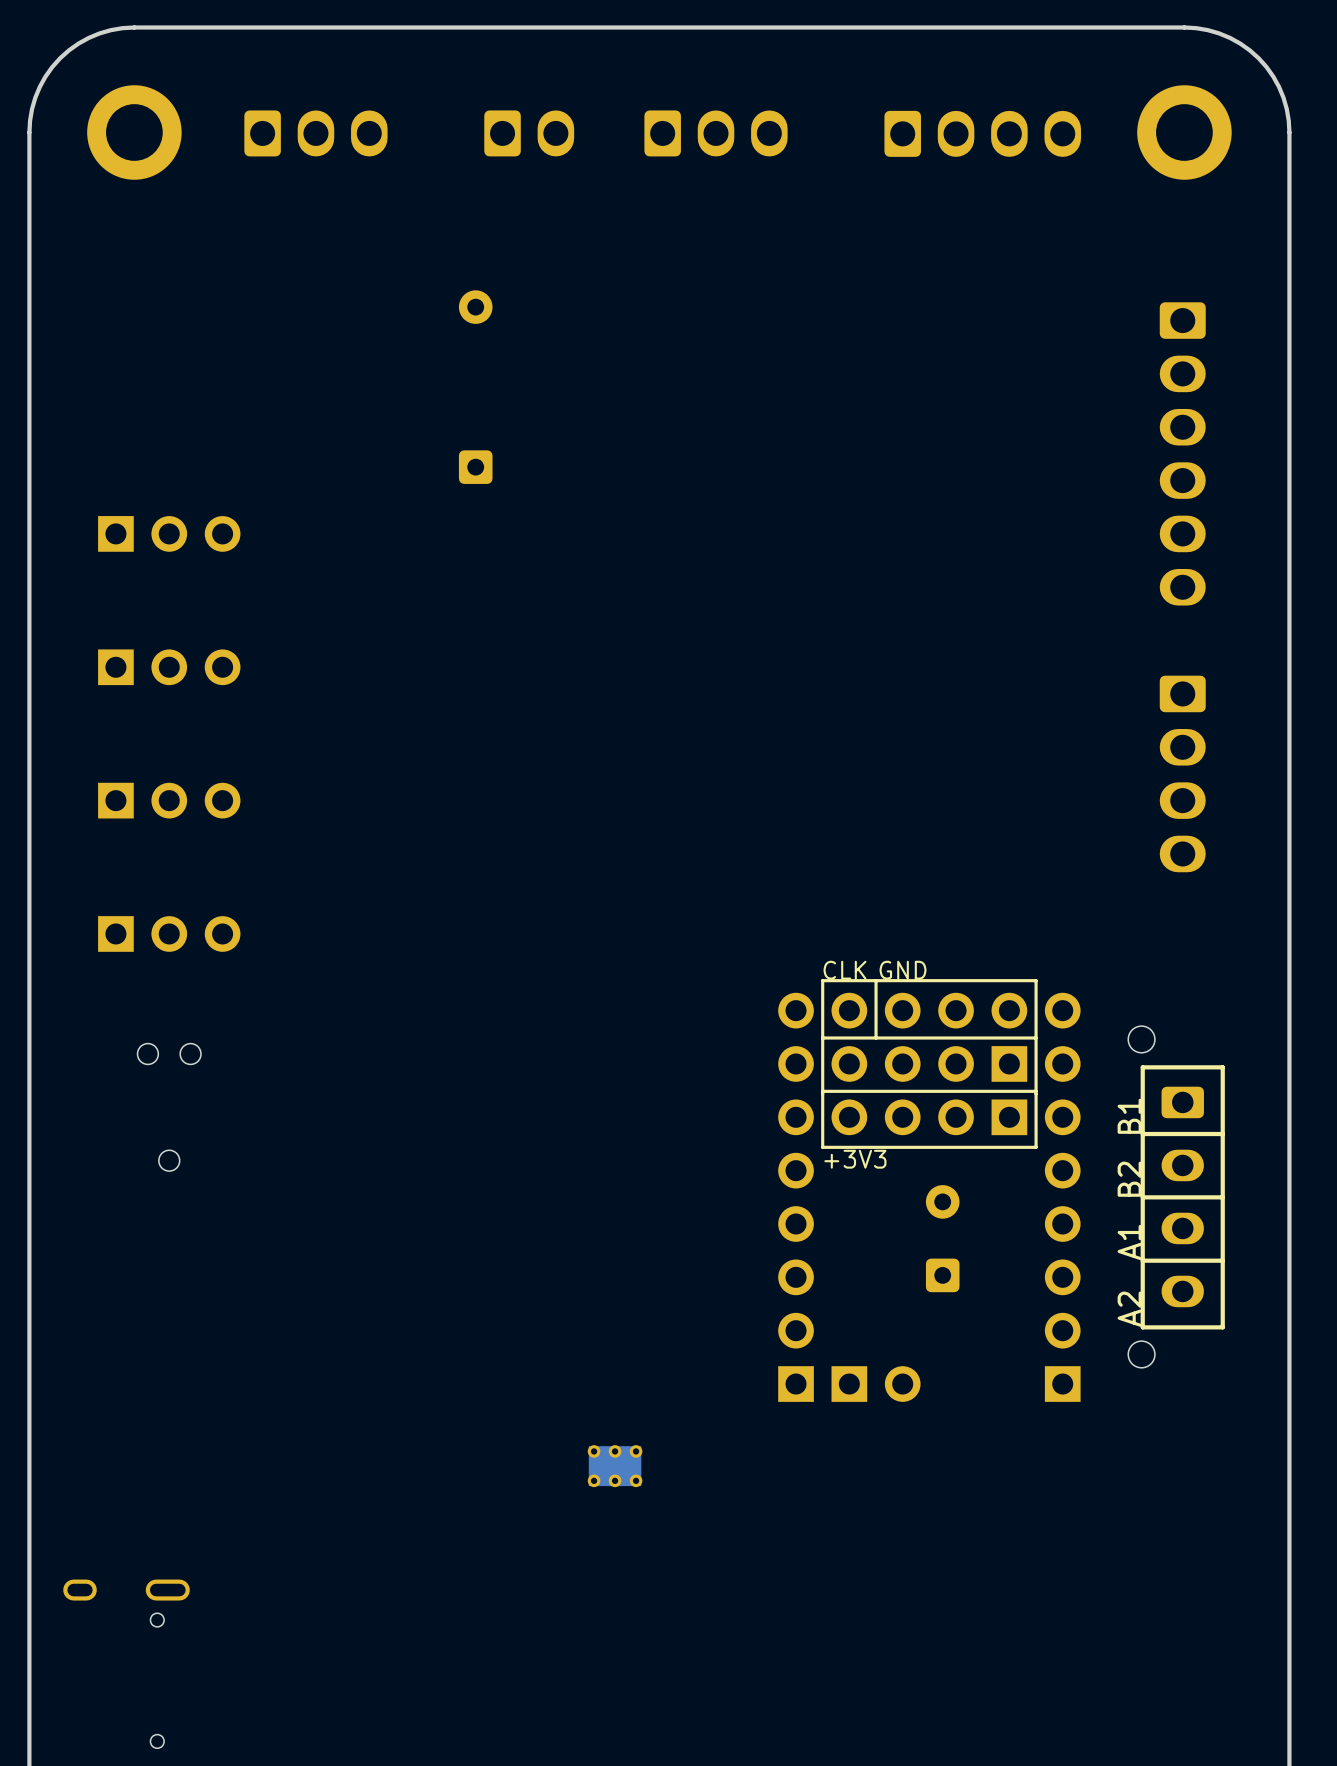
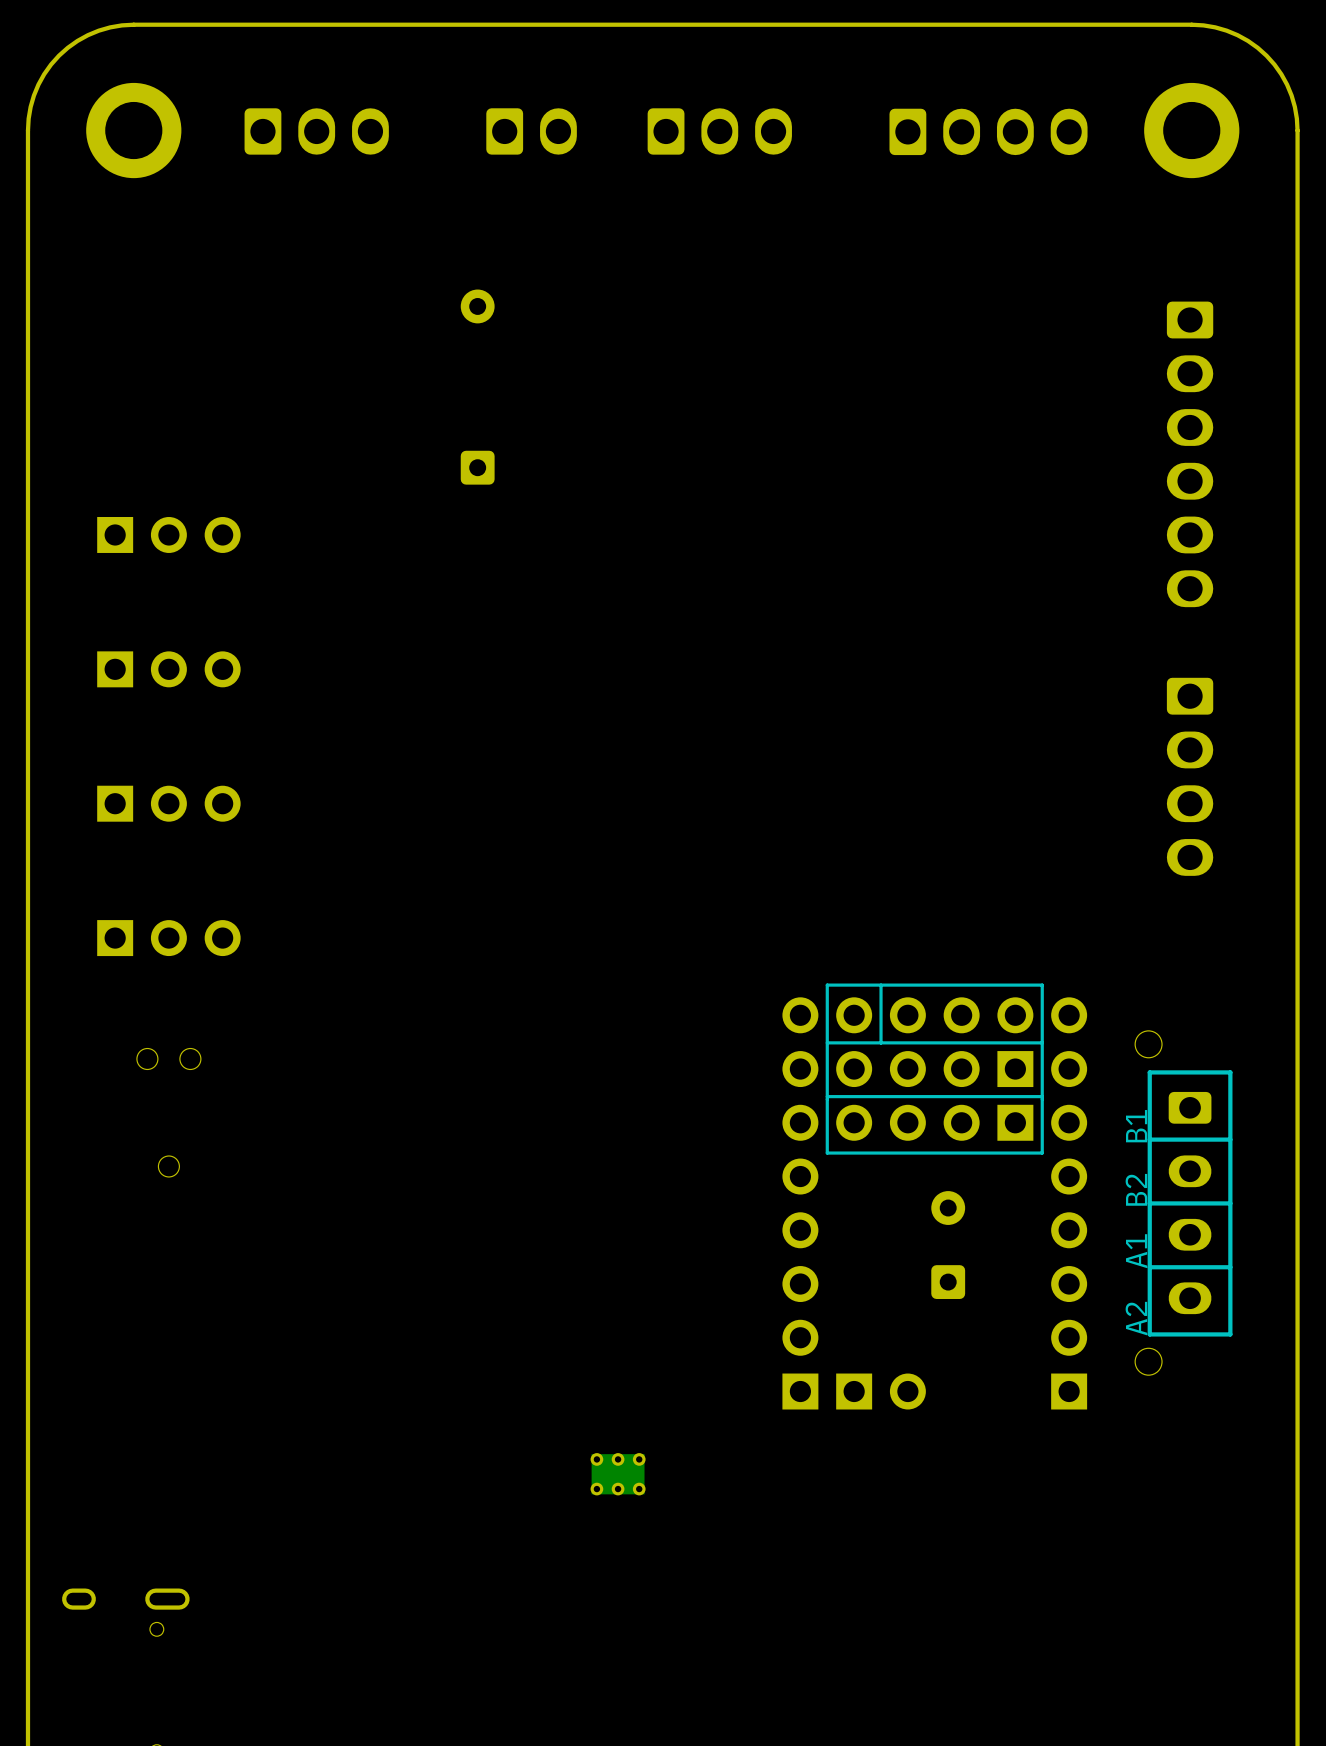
text: CLK (845, 970) -> none
text: GND (903, 970) -> none
text: +3V3 (855, 1159) -> none

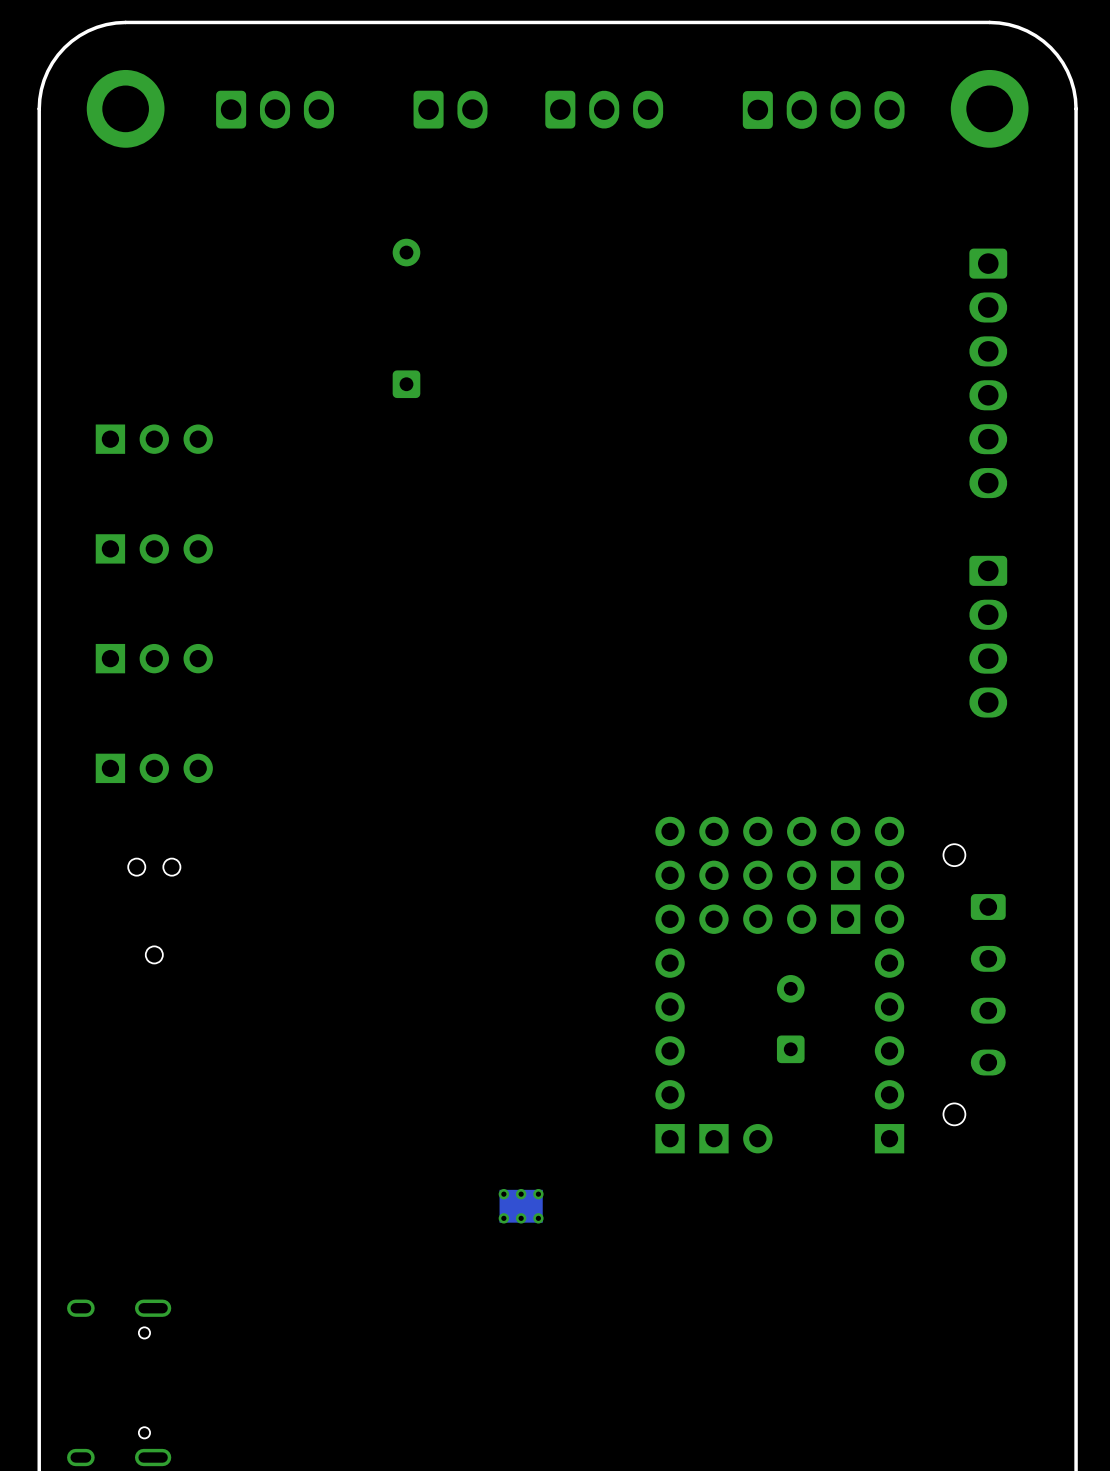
line: (881, 985) (881, 1042) -> none
line: (1042, 985) (1042, 1153) (827, 1153) (827, 985) (1042, 985) -> none
line: (1042, 1042) (827, 1042) -> none
line: (1230, 1072) (1149, 1072) (1149, 1334) (1230, 1334) (1230, 1072) -> none
line: (1042, 1096) (827, 1096) -> none
text: B1 (1136, 1126) -> none
line: (1230, 1139) (1149, 1139) -> none
text: B2 (1136, 1189) -> none
line: (1230, 1203) (1149, 1203) -> none
text: A1 (1136, 1251) -> none
line: (1230, 1267) (1149, 1267) -> none
text: A2 (1136, 1318) -> none

